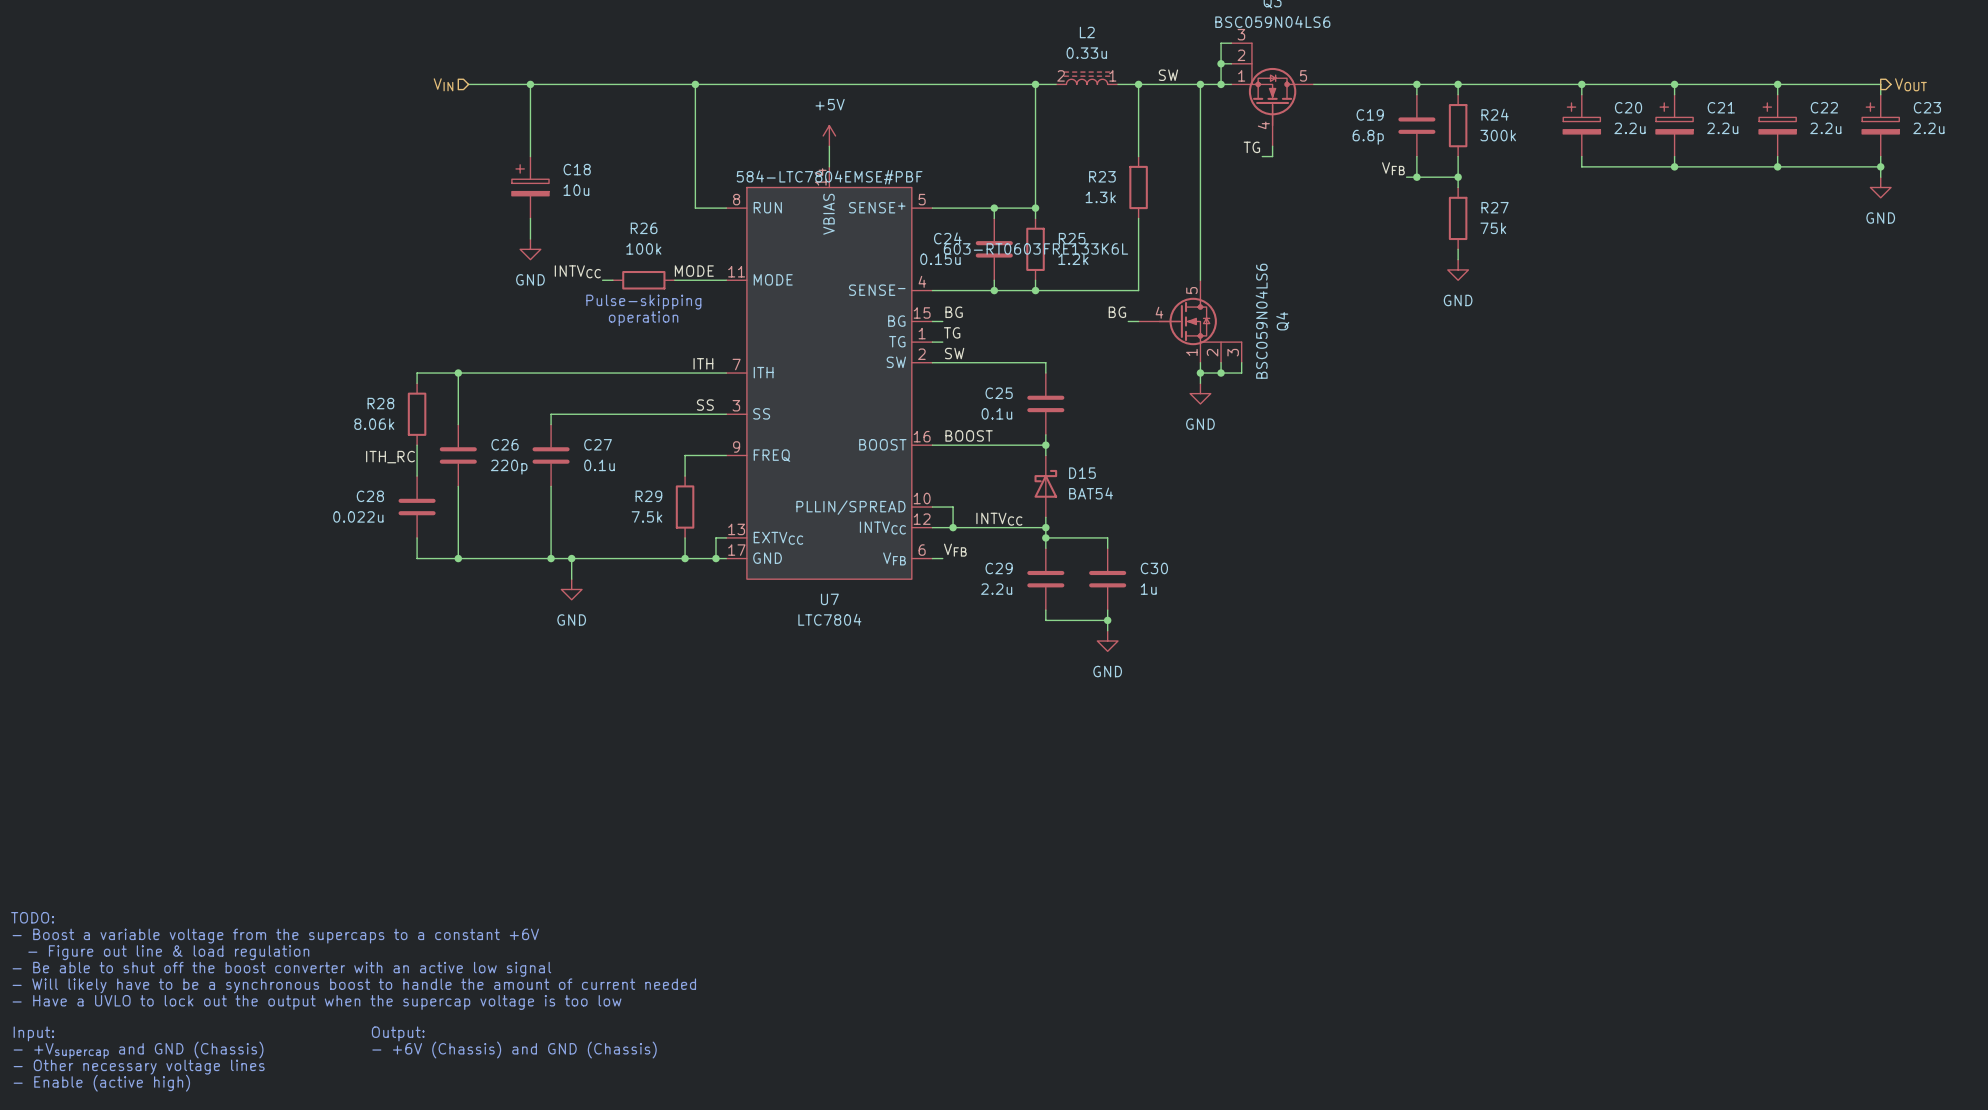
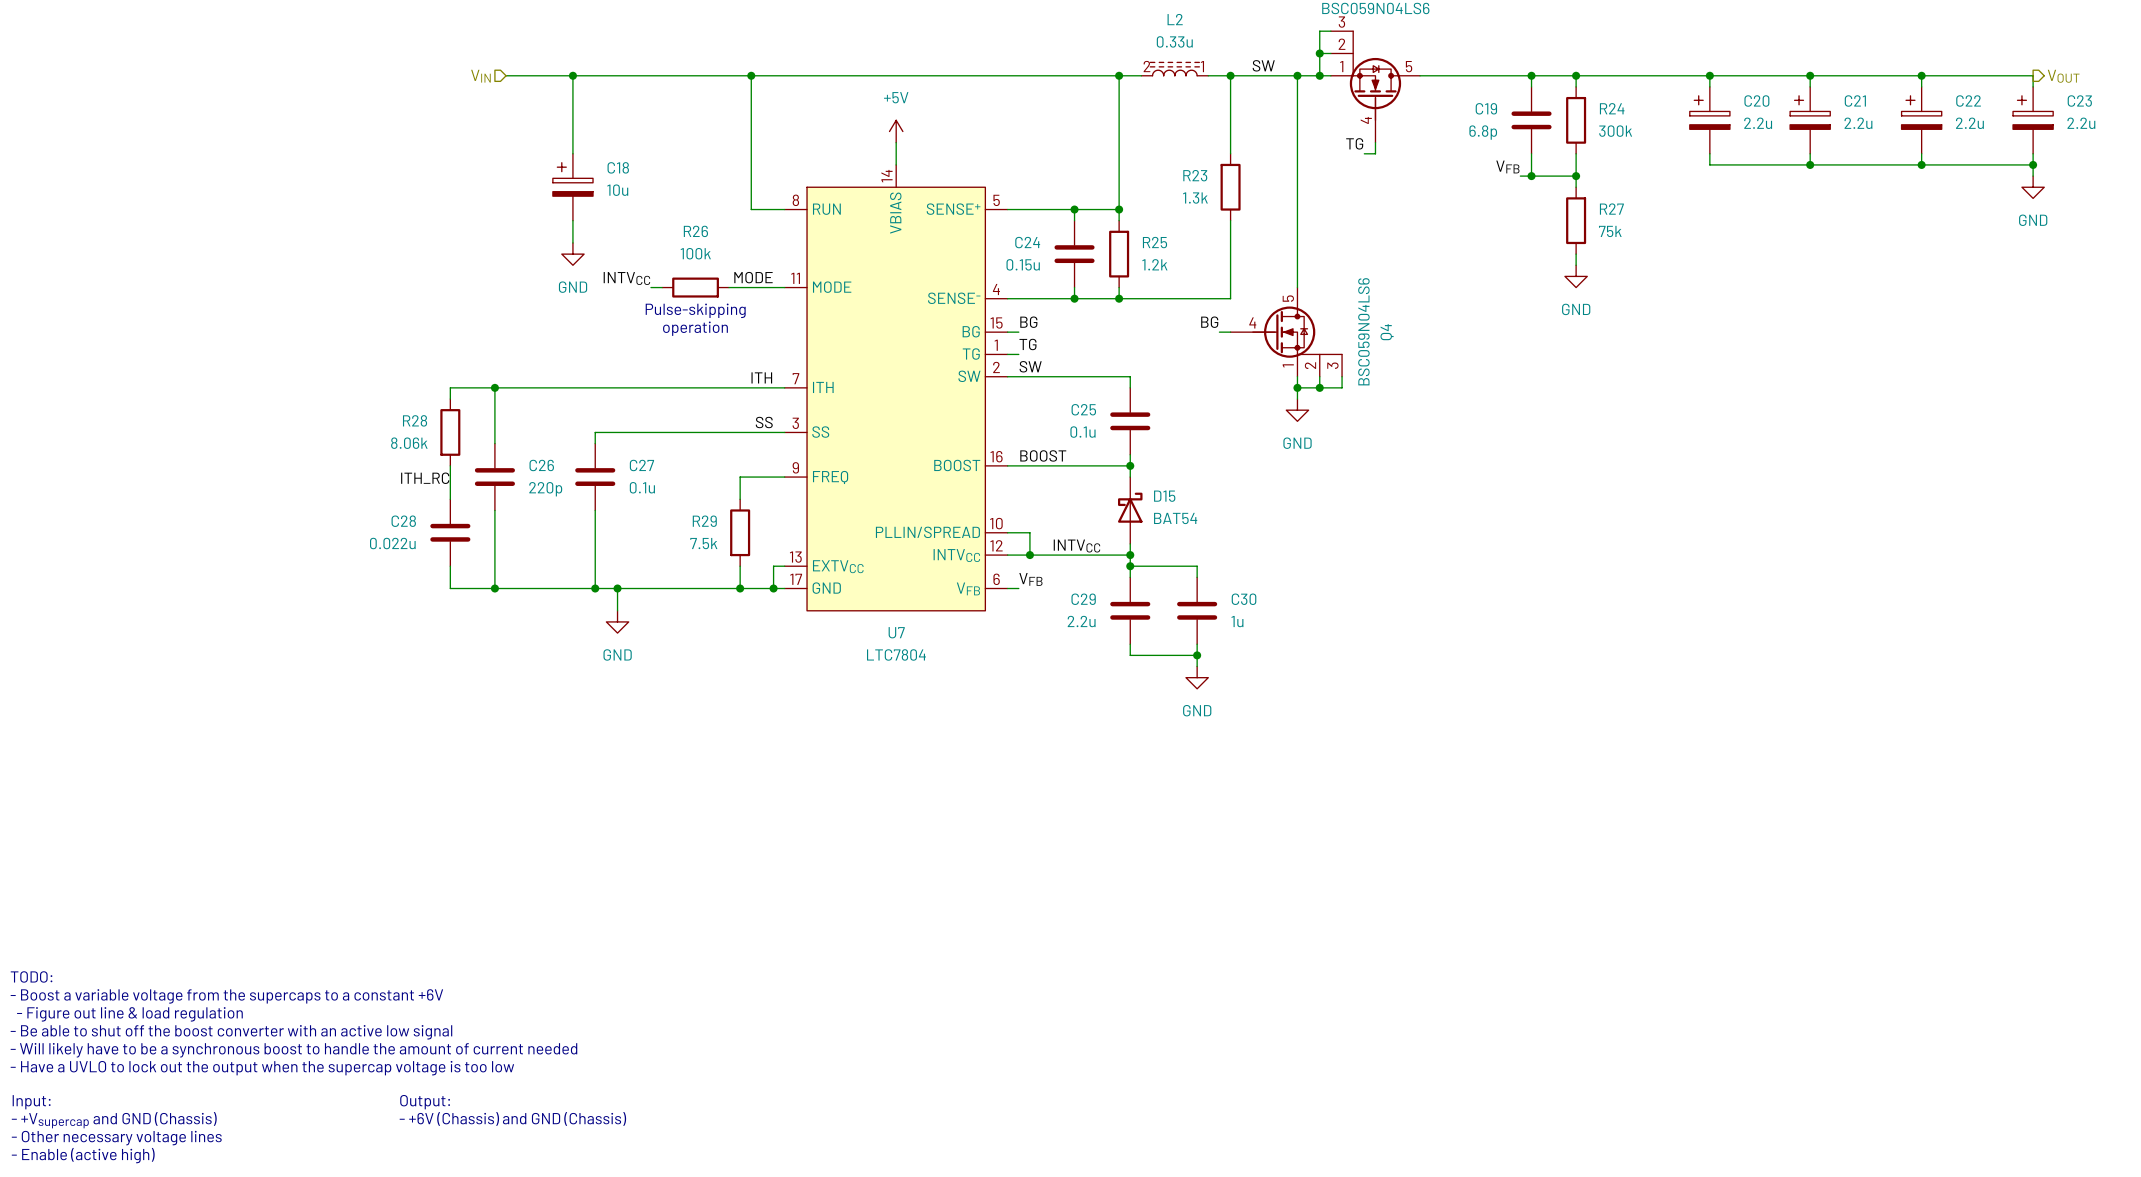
U7 text: 584-LTC7804EMSE#PBF (829, 177) -> none
R25 text: 603-RT0603FRE133K6L (1036, 248) -> none

